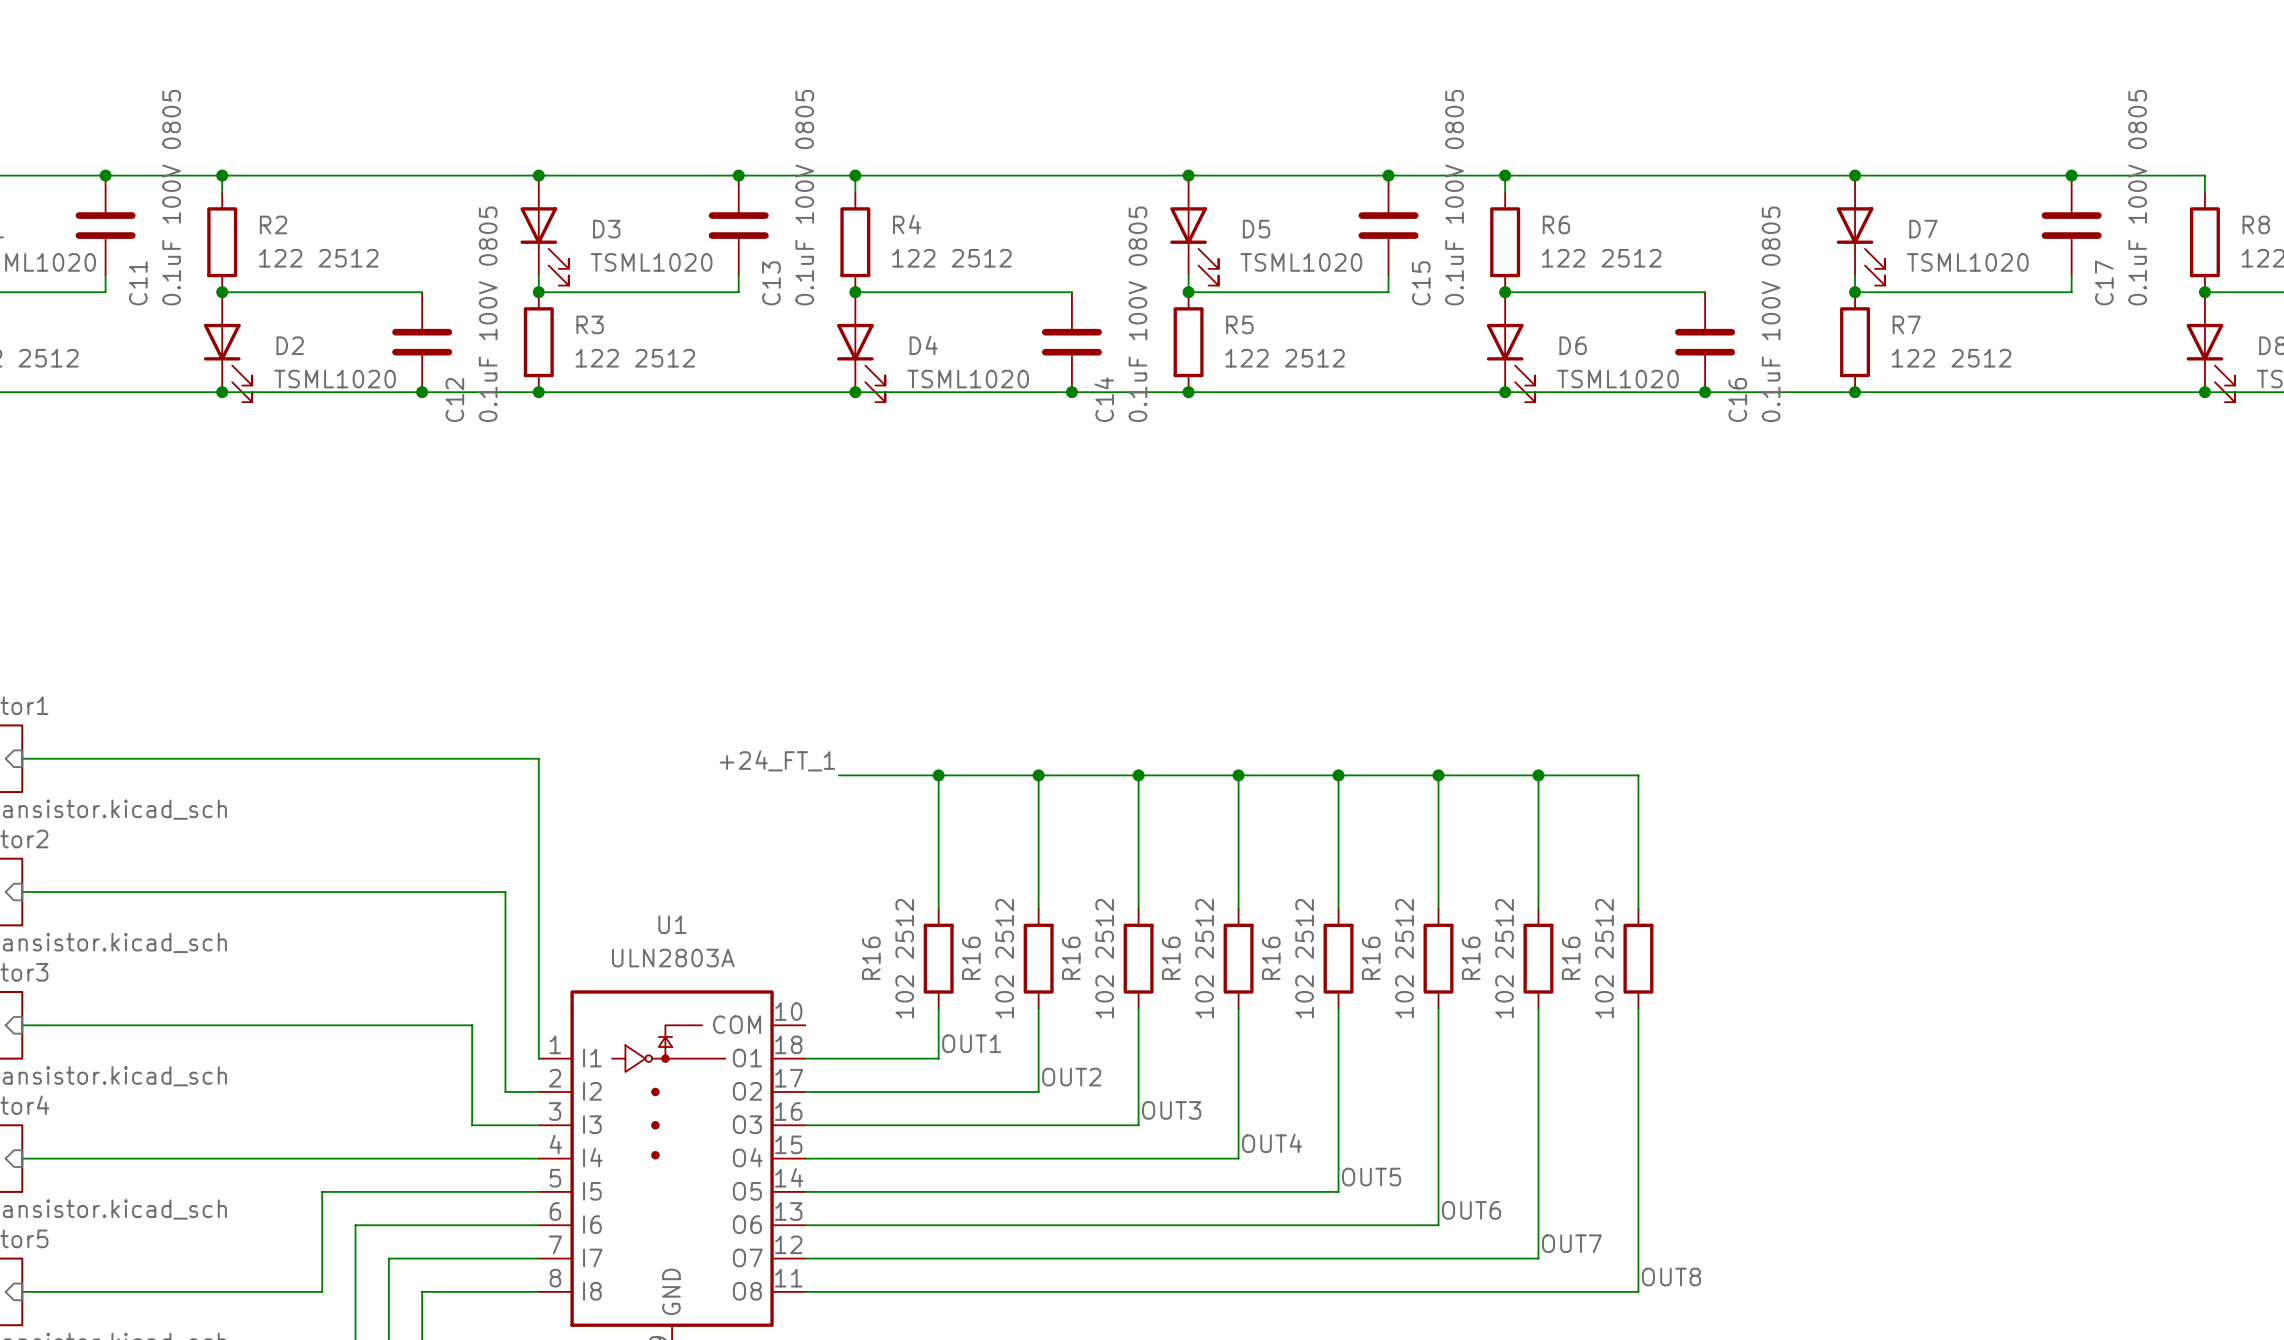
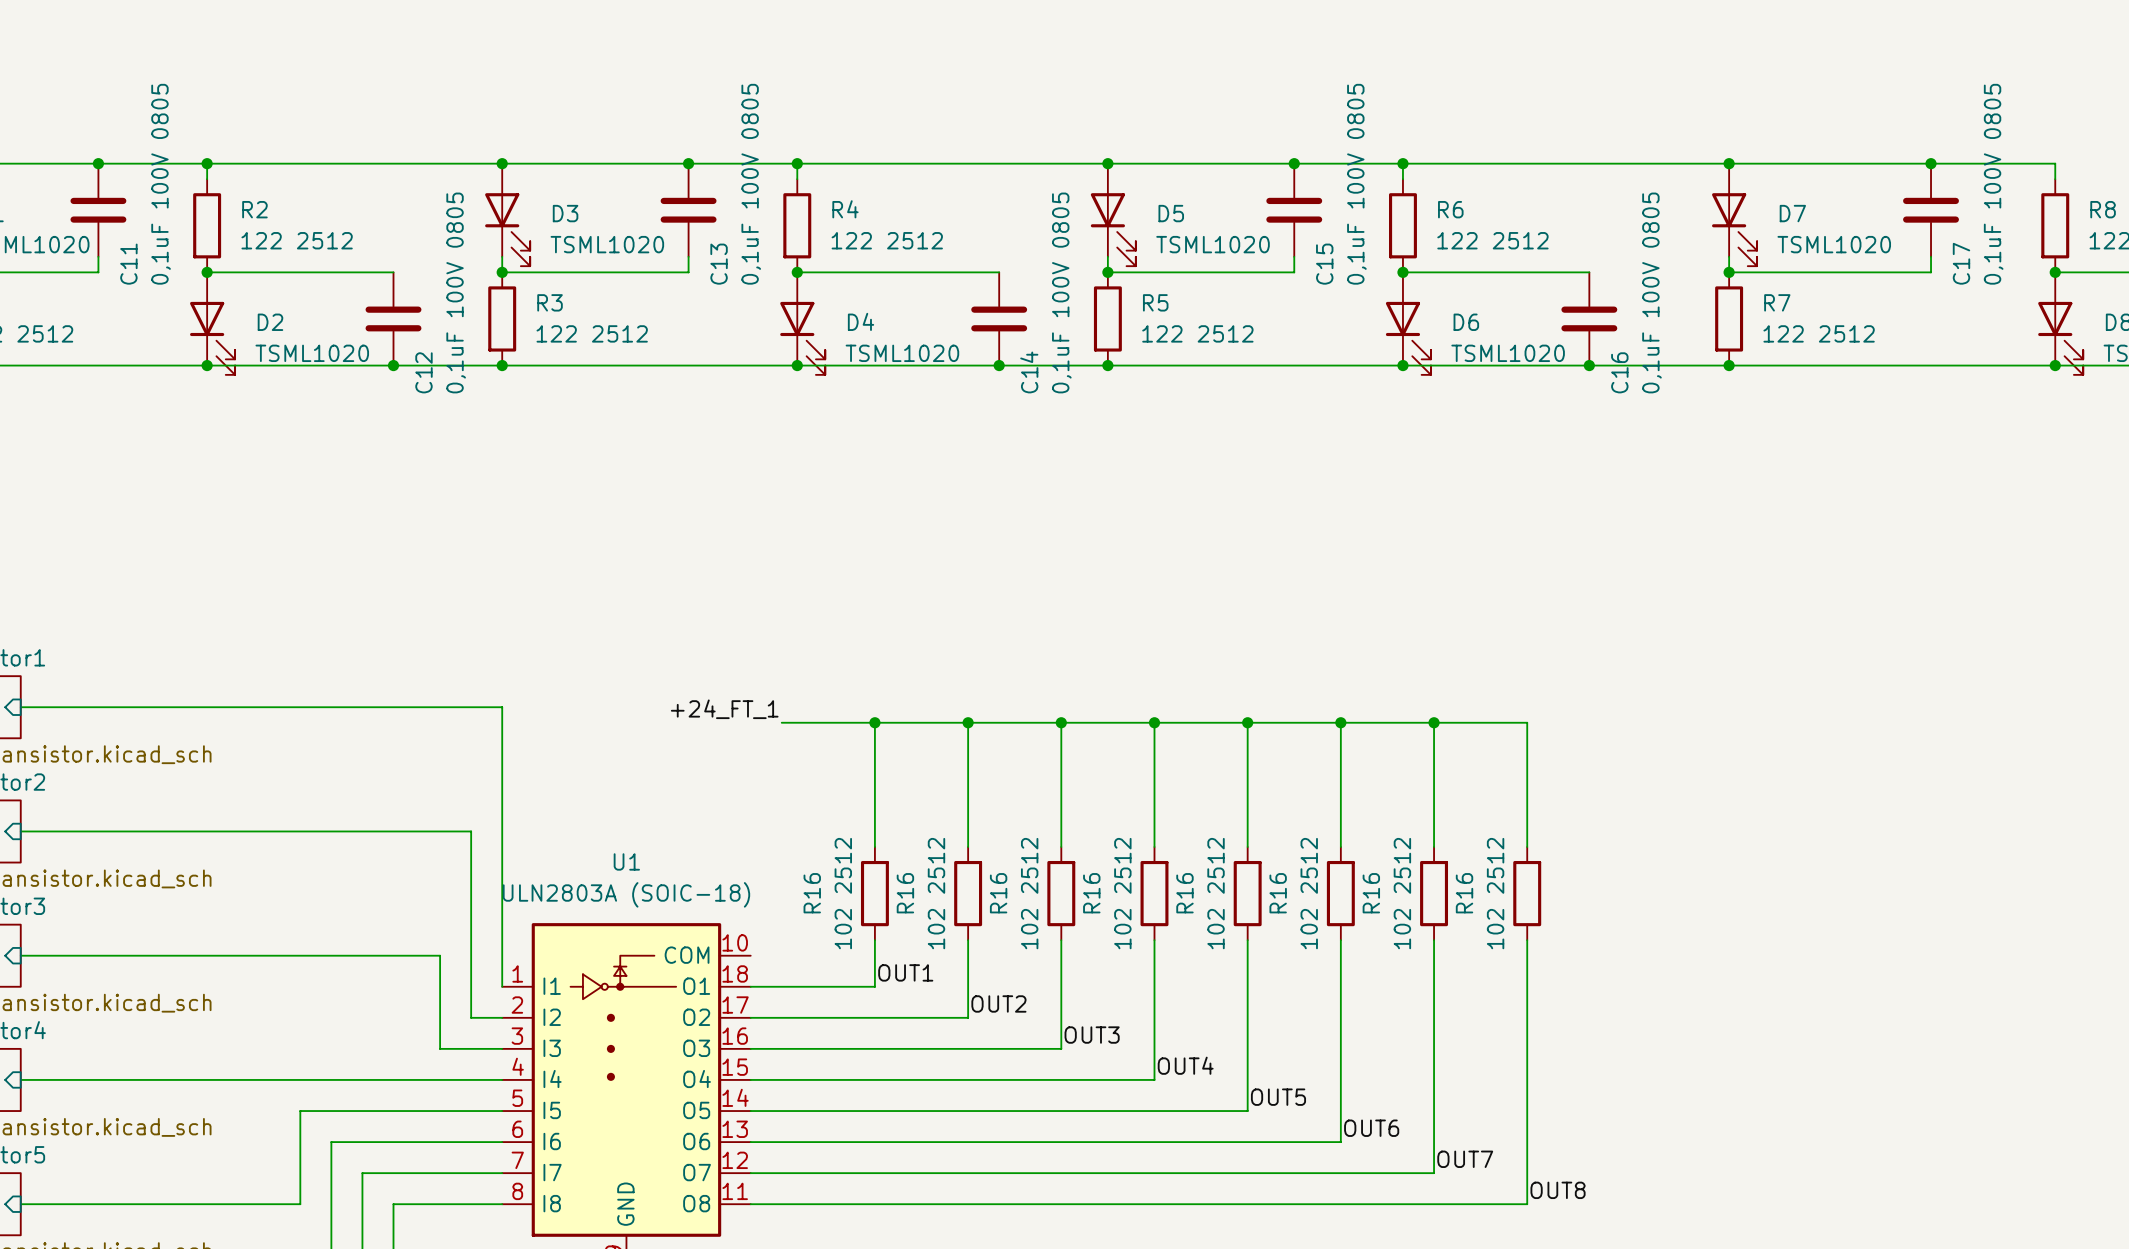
C11 value: 0.1uF 100V 0805 (171, 197) -> 0,1uF 100V 0805 (161, 184)
C13 value: 0.1uF 100V 0805 (804, 197) -> 0,1uF 100V 0805 (751, 184)
C15 value: 0.1uF 100V 0805 (1454, 197) -> 0,1uF 100V 0805 (1356, 184)
C17 value: 0.1uF 100V 0805 (2137, 197) -> 0,1uF 100V 0805 (1993, 184)
C12 value: 0.1uF 100V 0805 (488, 314) -> 0,1uF 100V 0805 (456, 292)
C14 value: 0.1uF 100V 0805 (1137, 314) -> 0,1uF 100V 0805 (1061, 292)
C16 value: 0.1uF 100V 0805 (1771, 314) -> 0,1uF 100V 0805 (1651, 292)
U1 value: ULN2803A (673, 958) -> ULN2803A (SOIC-18) (626, 894)

